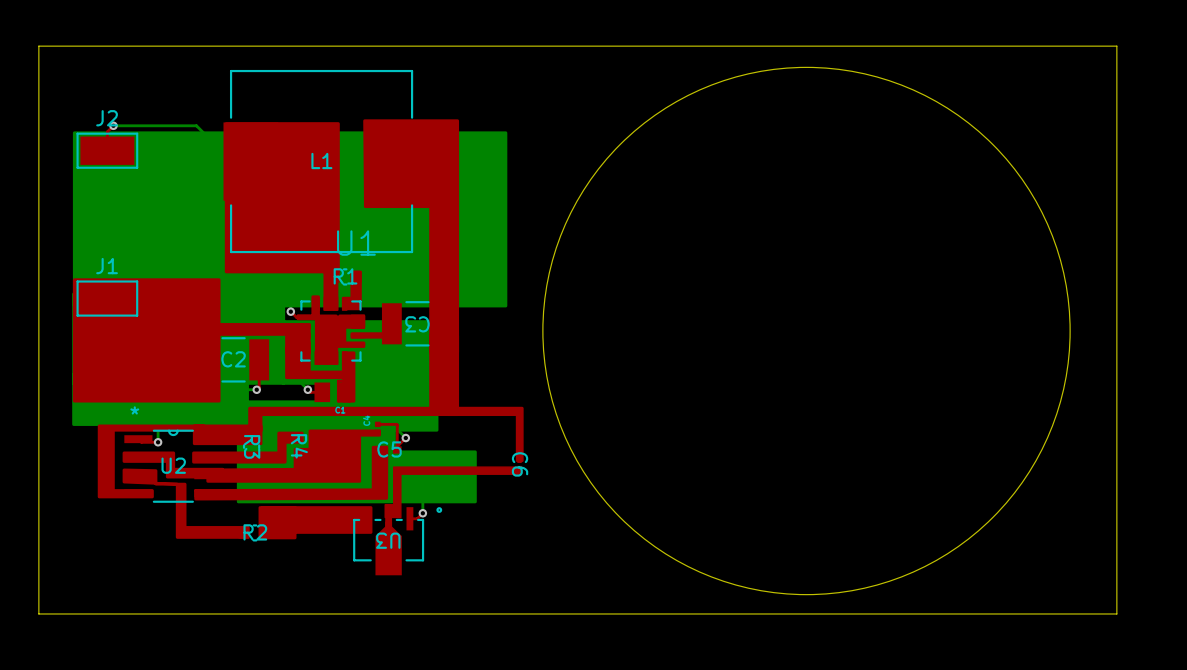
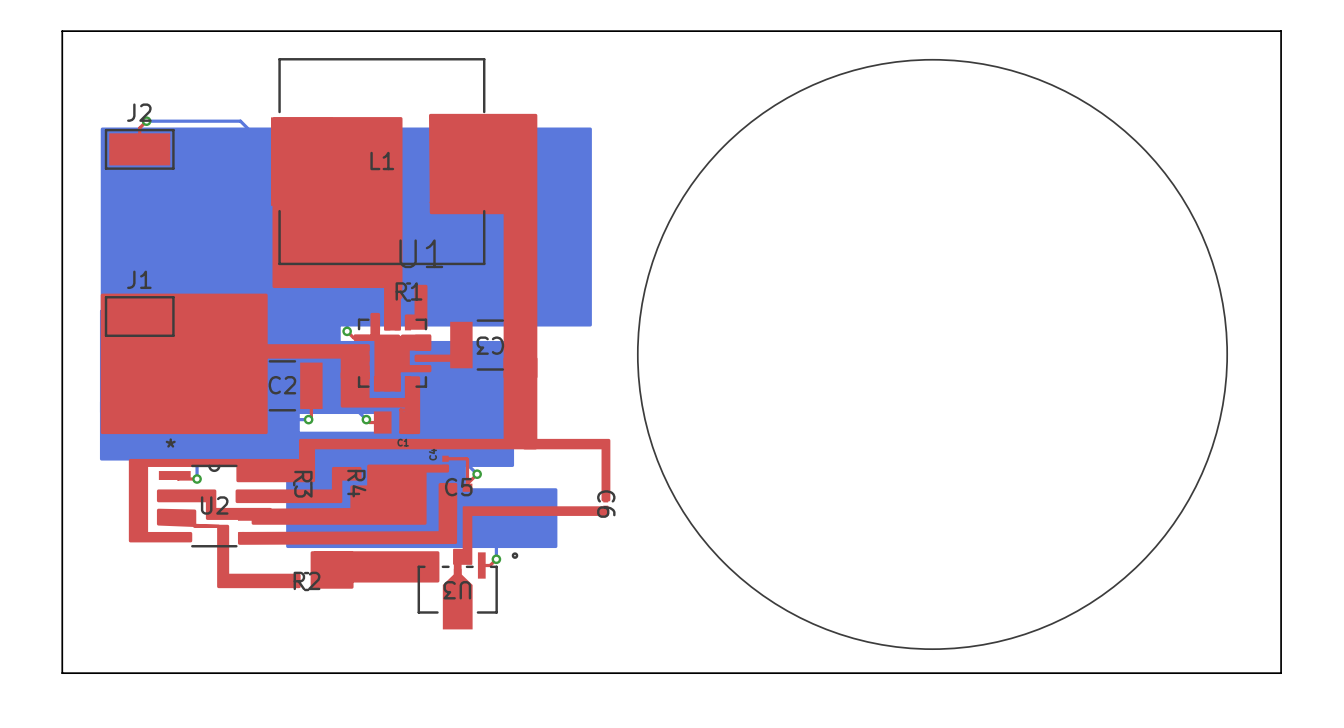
round board edge: [542, 67, 1071, 595] -> none
drawing: none -> [636, 58, 1228, 650]

